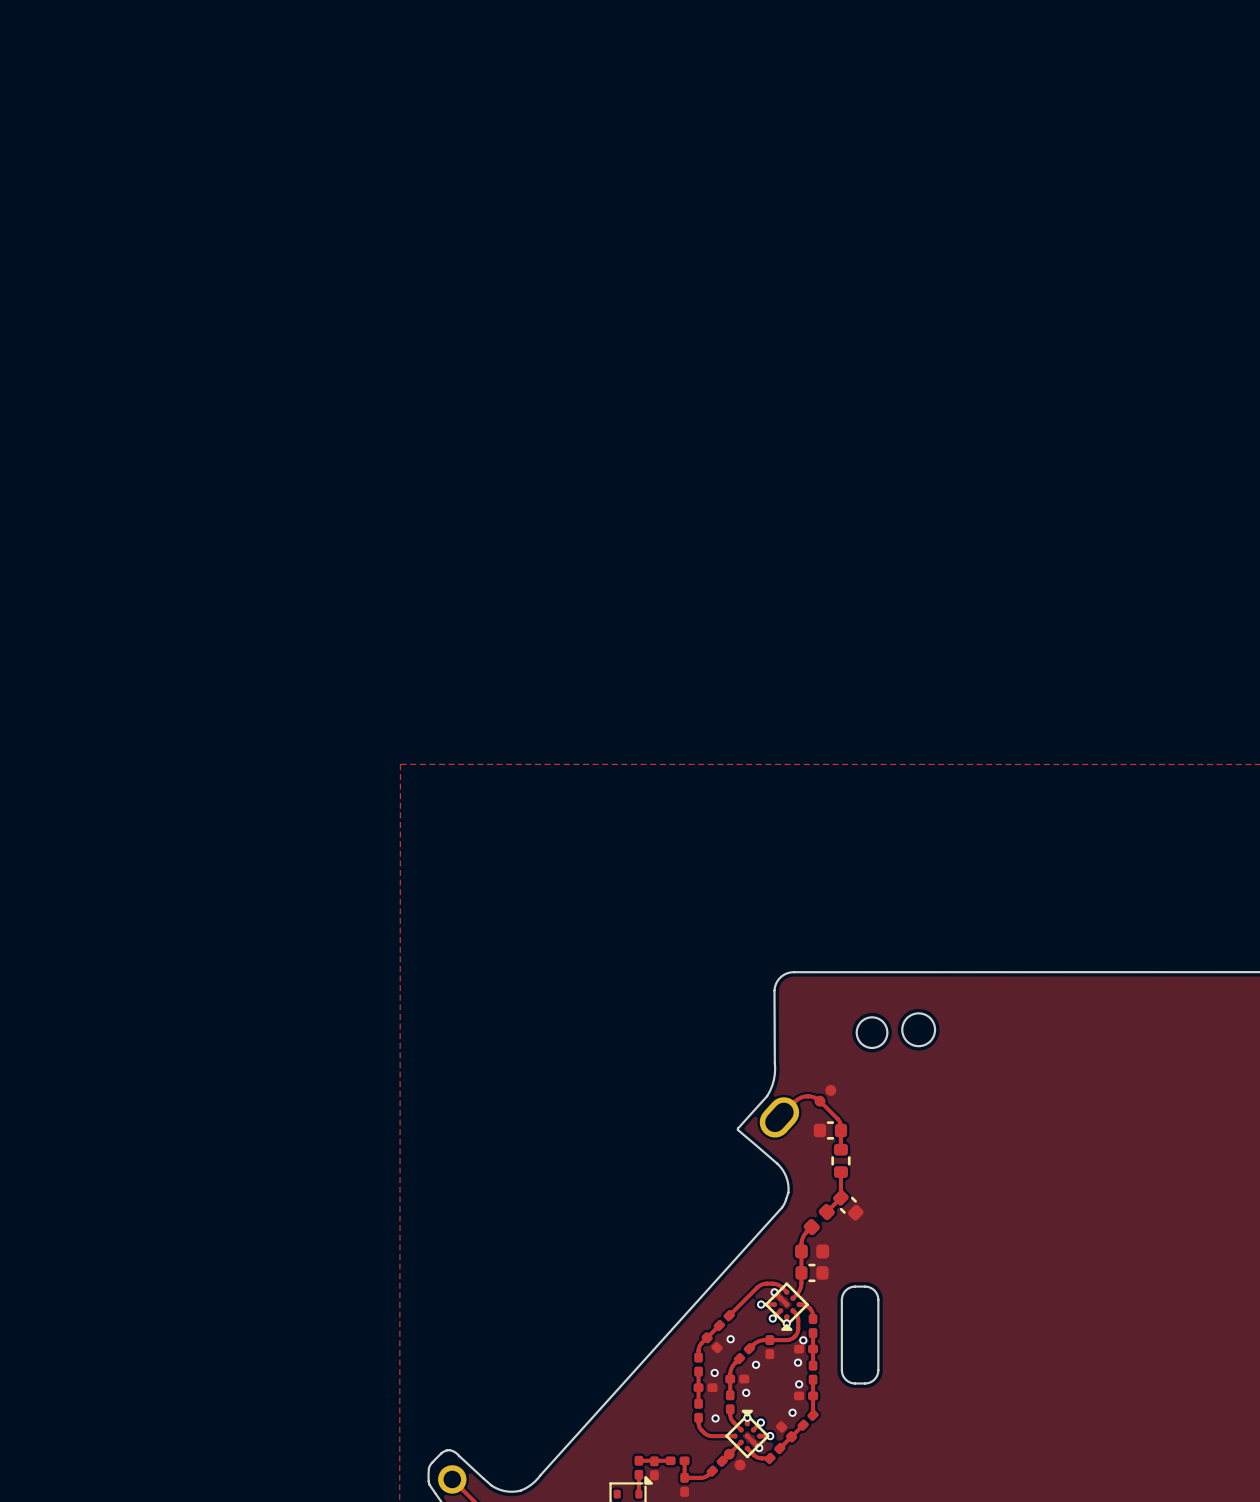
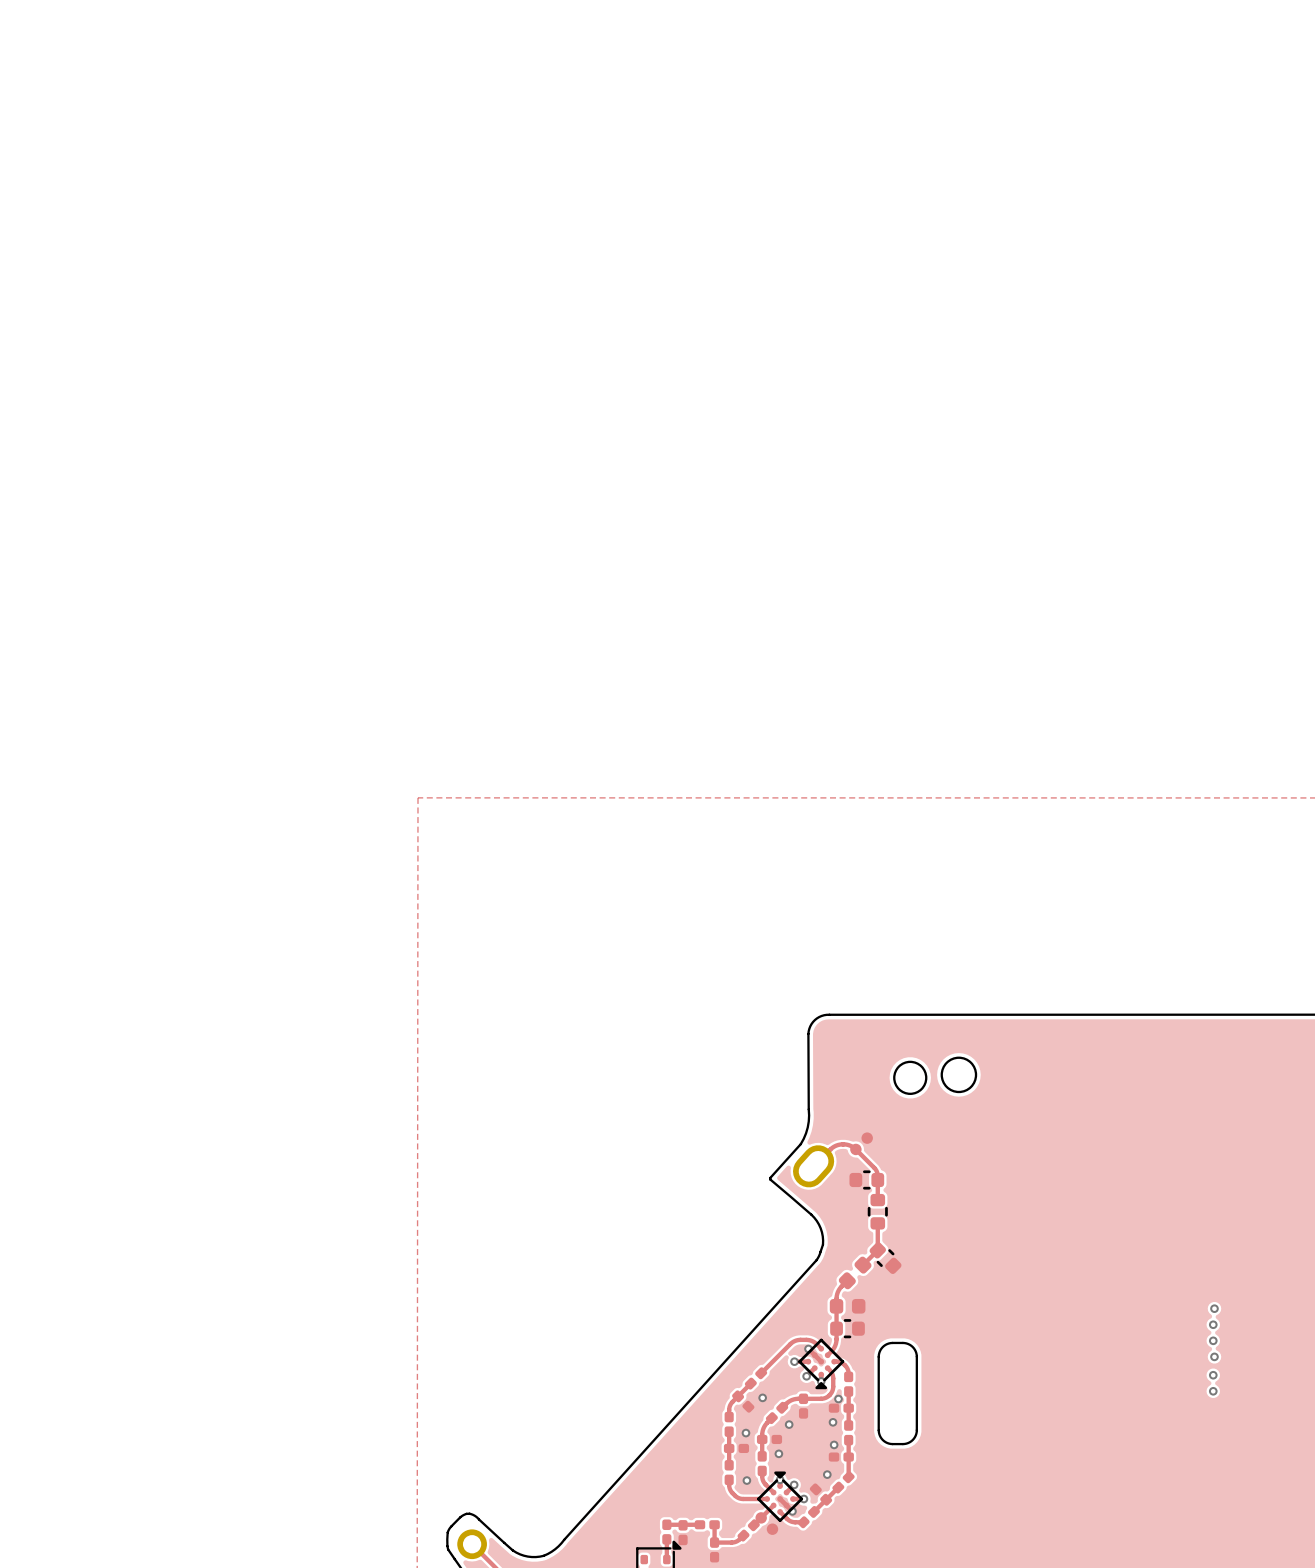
via: none -> (1214, 1308)
via: none -> (1213, 1324)
via: none -> (1213, 1340)
via: none -> (1214, 1356)
via: none -> (1213, 1375)
via: none -> (1213, 1391)

